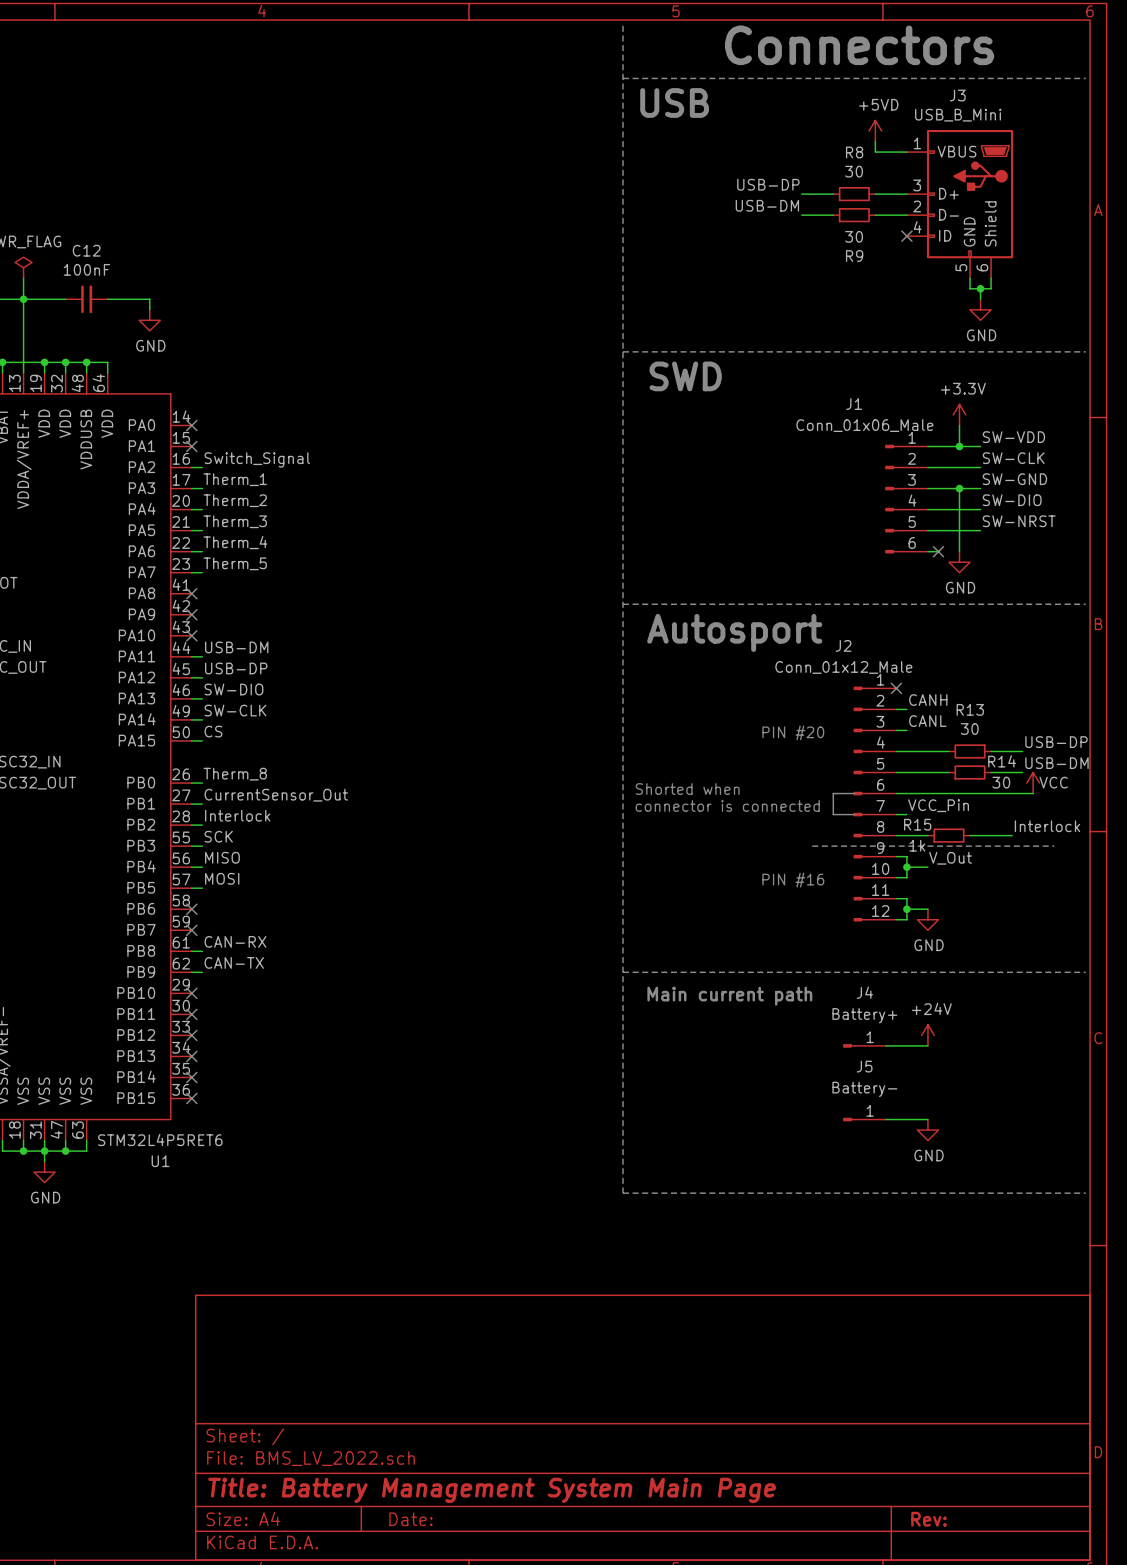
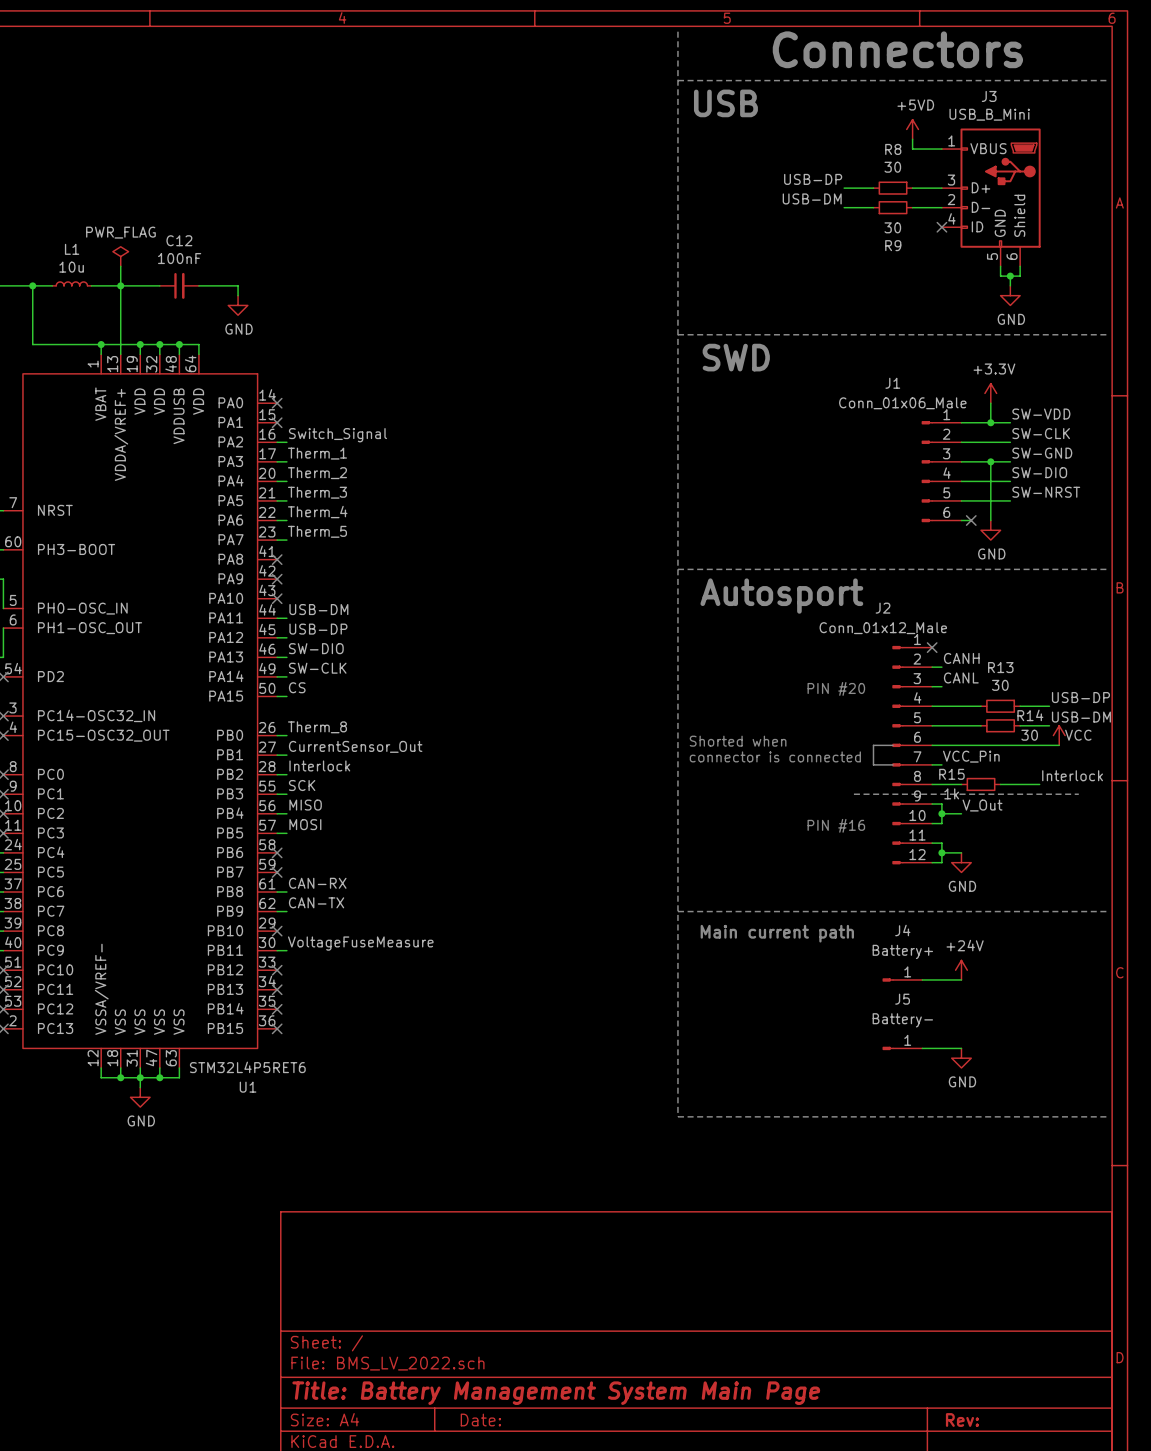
label: none -> VoltageFuseMeasure (360, 943)
wire: none -> (277, 950) (286, 950)
no-connect mark: (191, 1014) -> none

